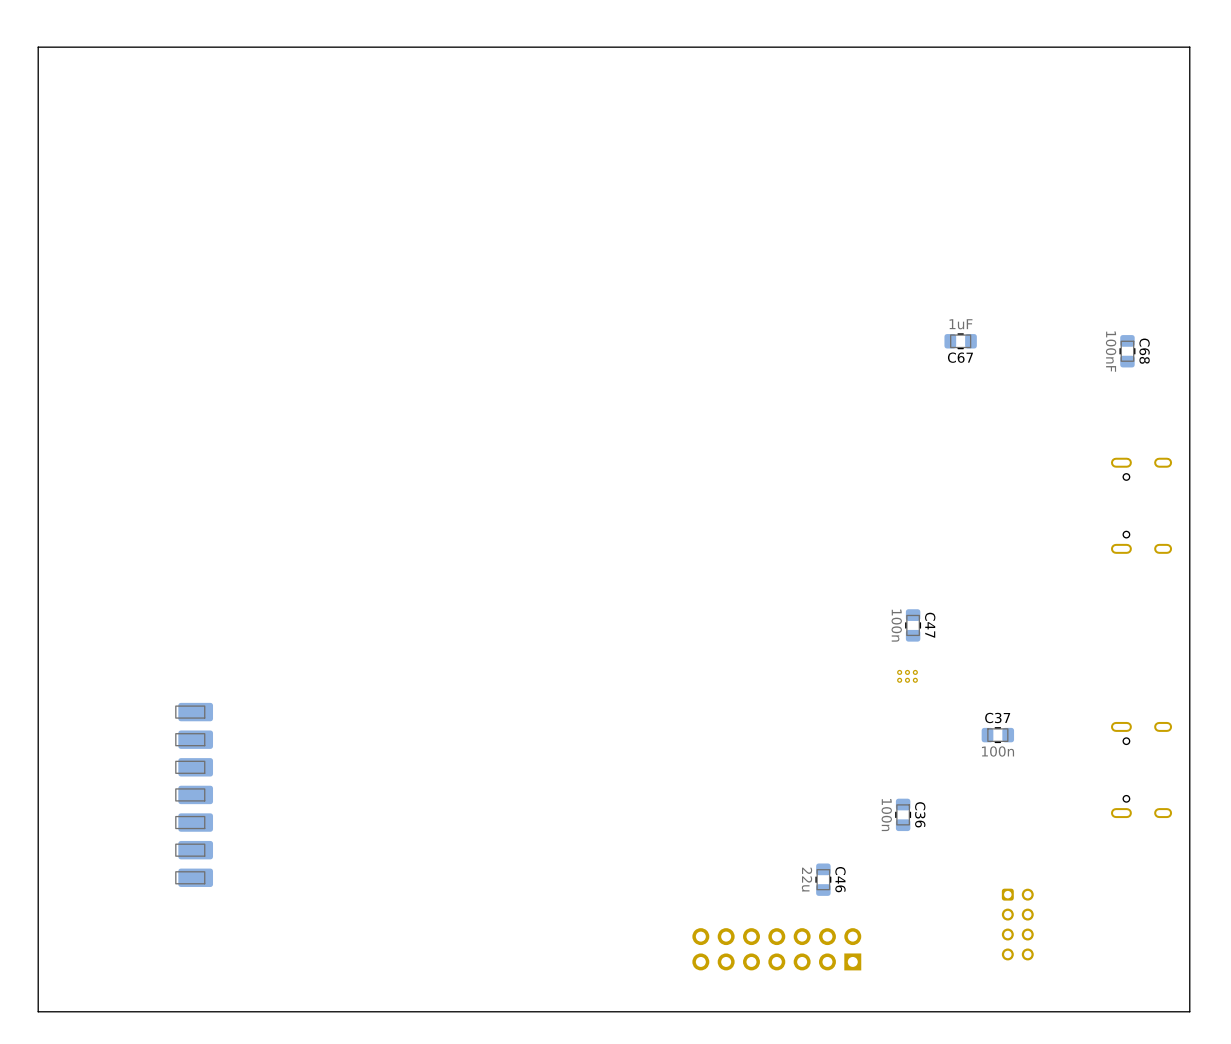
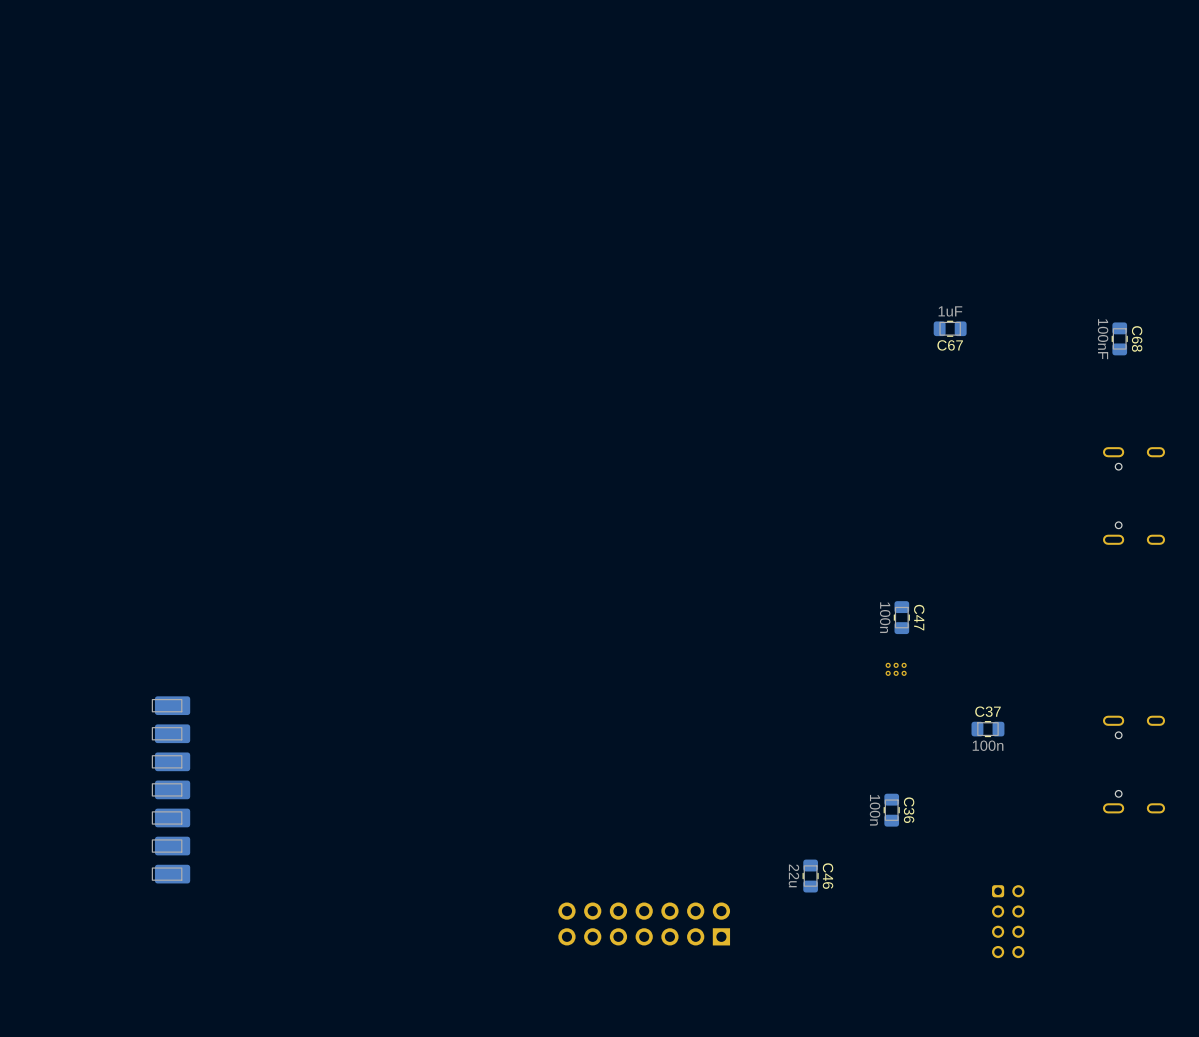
board edge: (1189, 47) (38, 47) (38, 1011) (1189, 1011) (1189, 47) -> none
part position: (776, 949) -> (644, 923)

